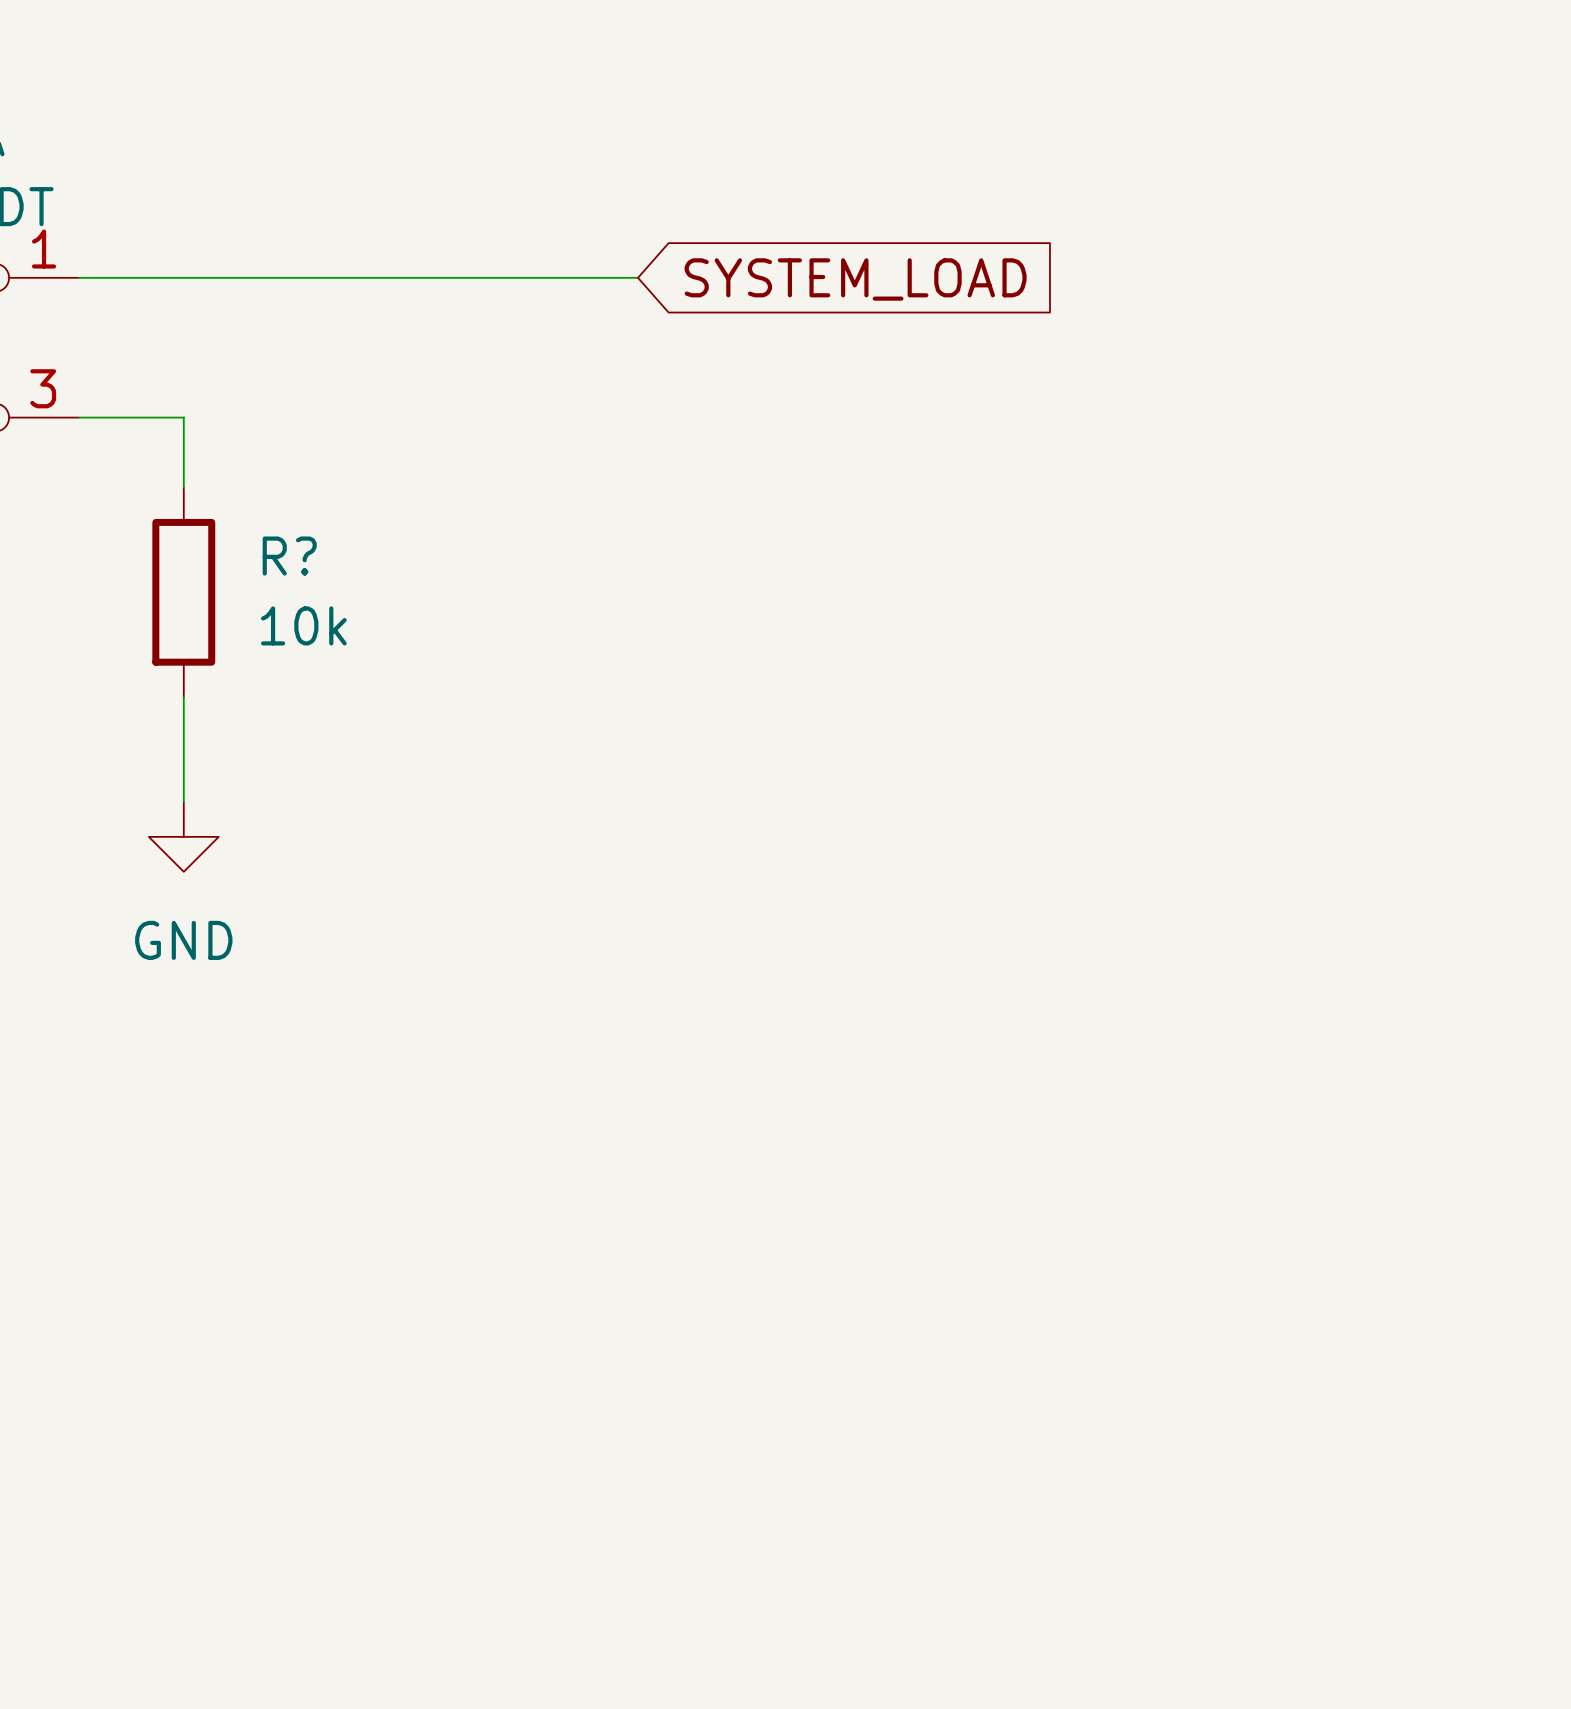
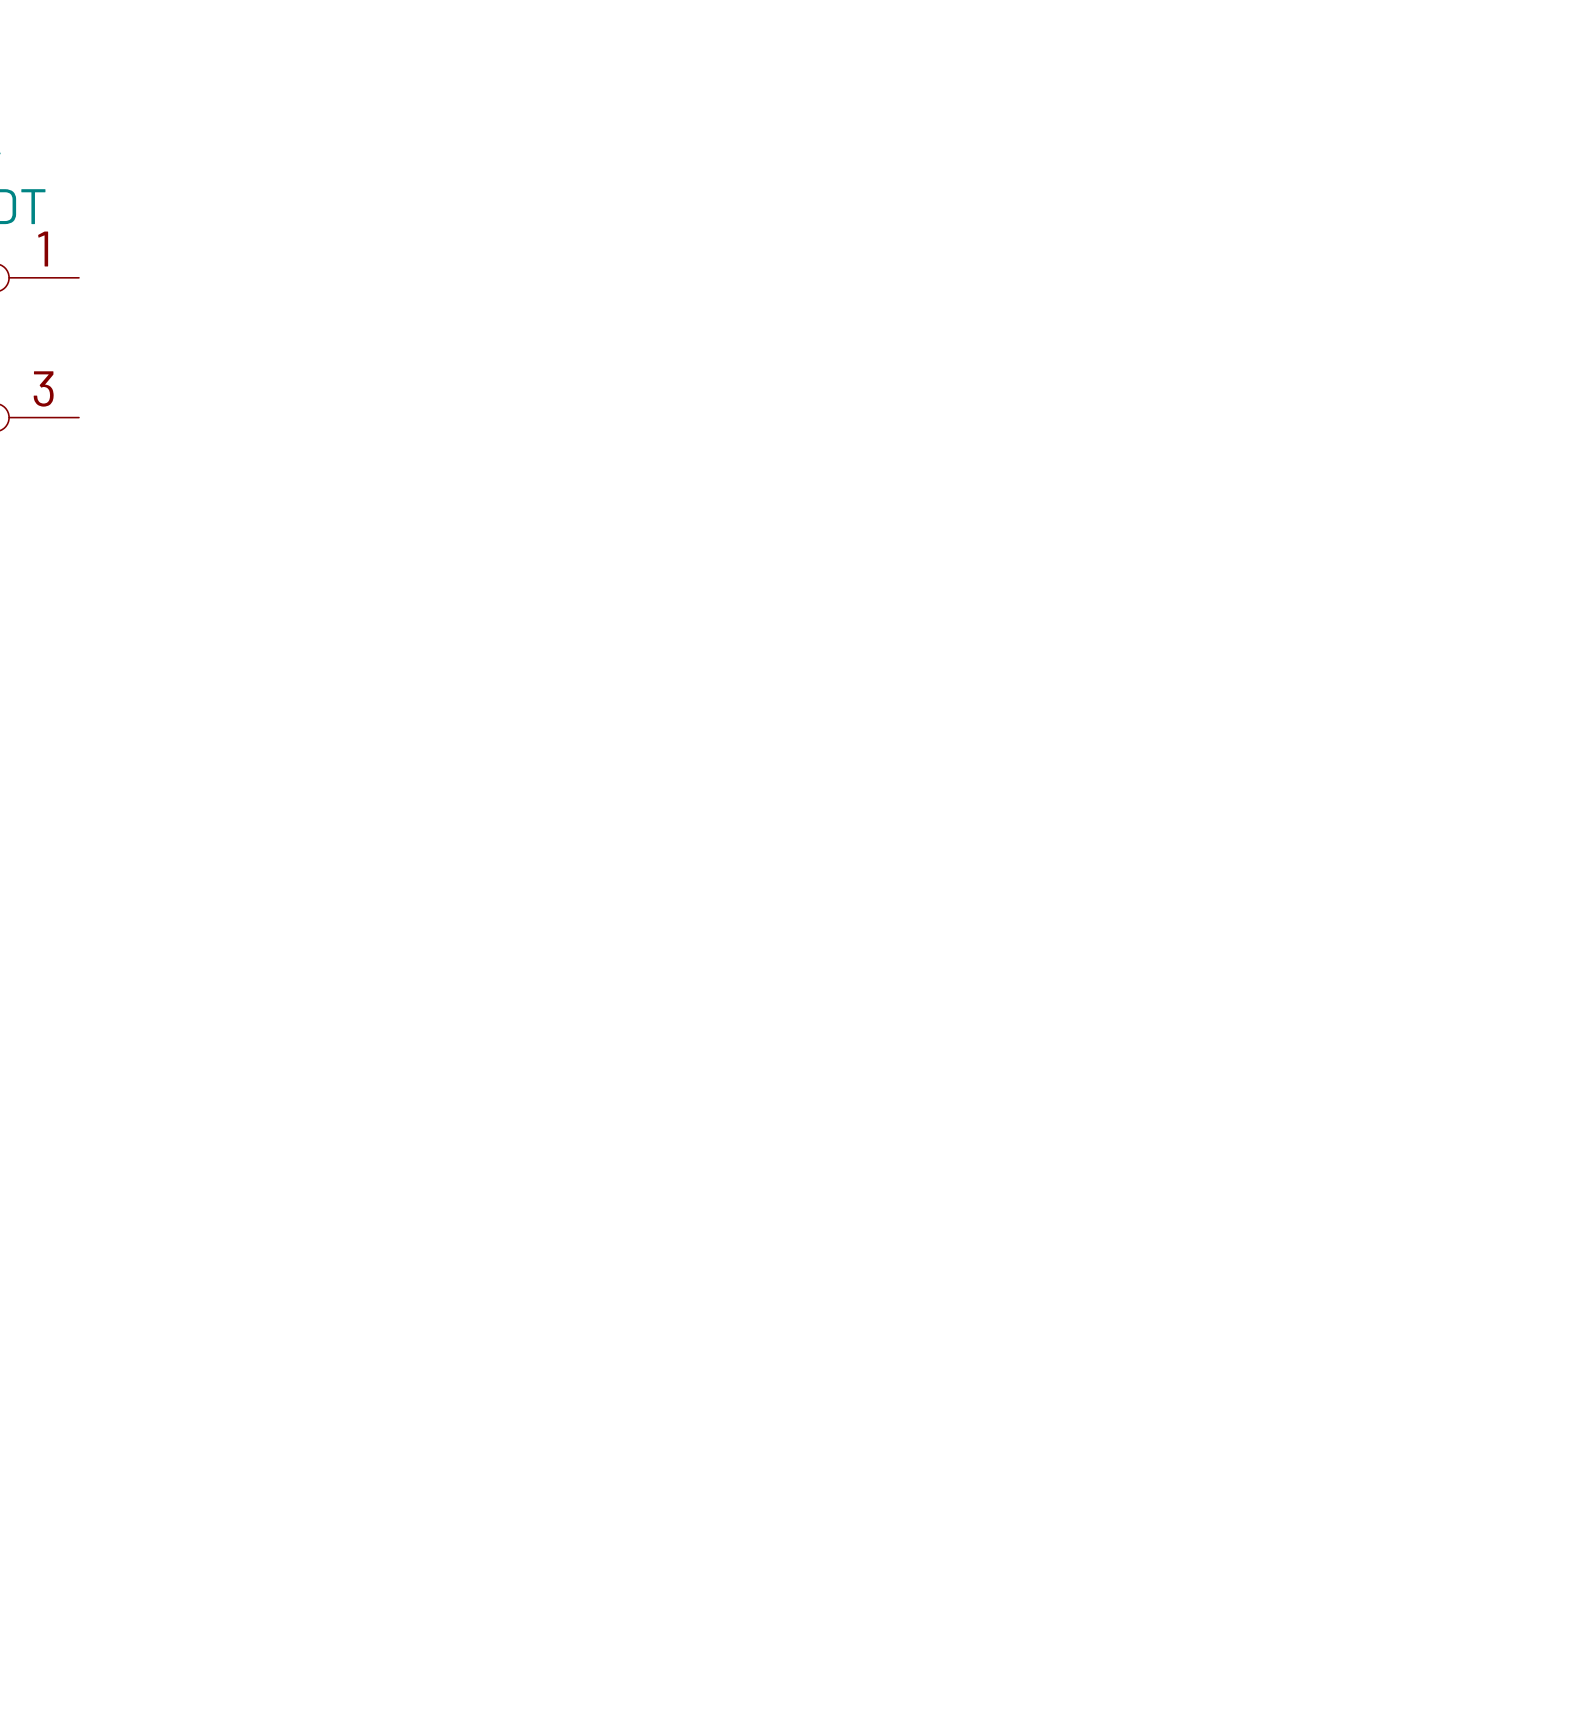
wire: (78, 277) (638, 277) -> none
global label: SYSTEM_LOAD (855, 279) -> none
wire: (78, 417) (183, 417) (183, 487) -> none
R?: 10k (183, 592) -> none
wire: (183, 697) (183, 801) -> none
power symbol: GND (183, 836) -> none

